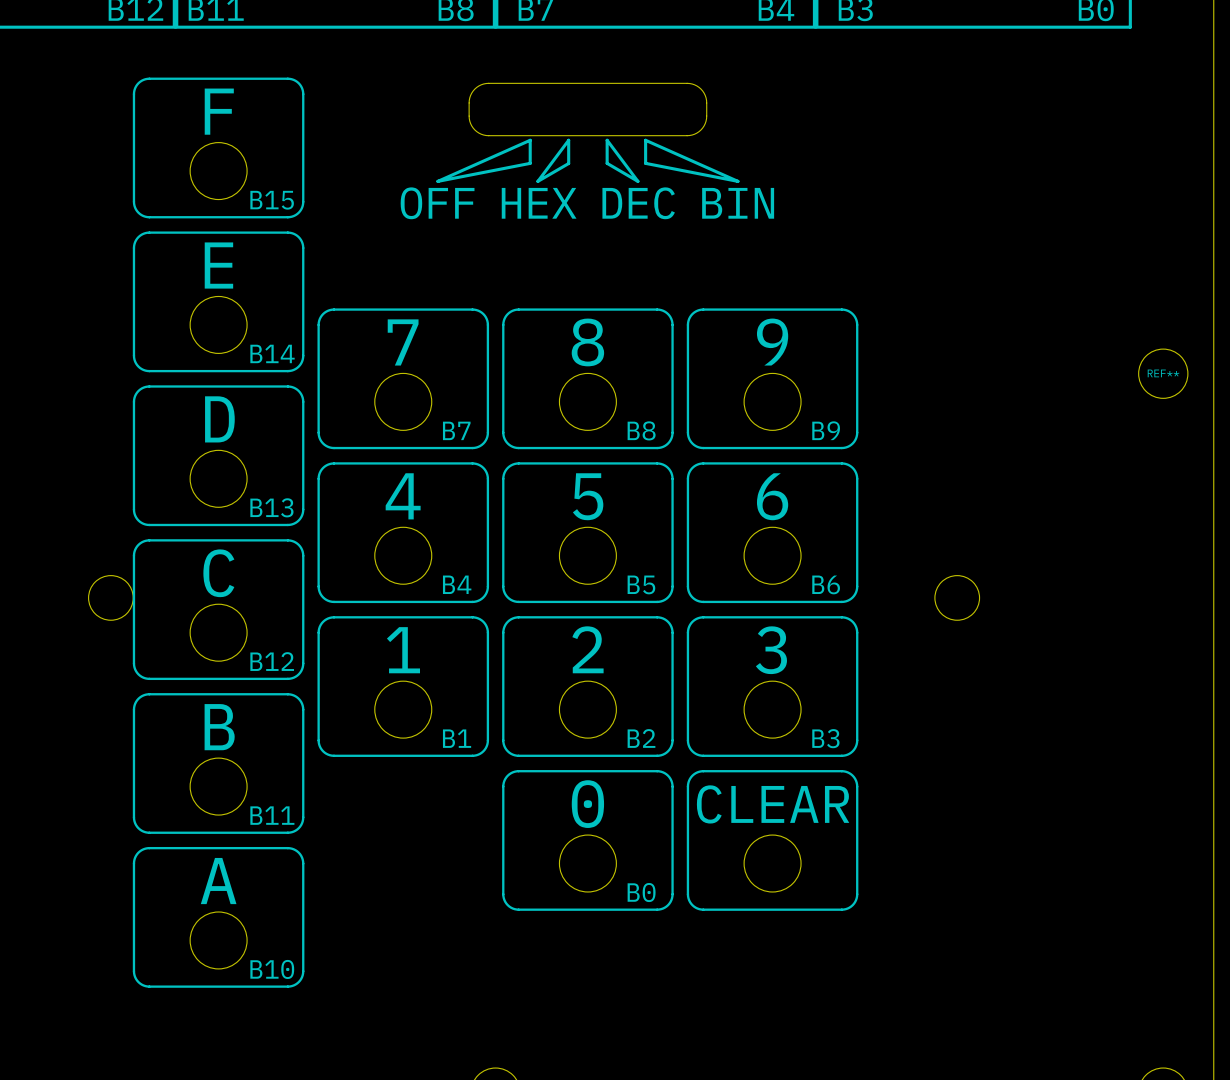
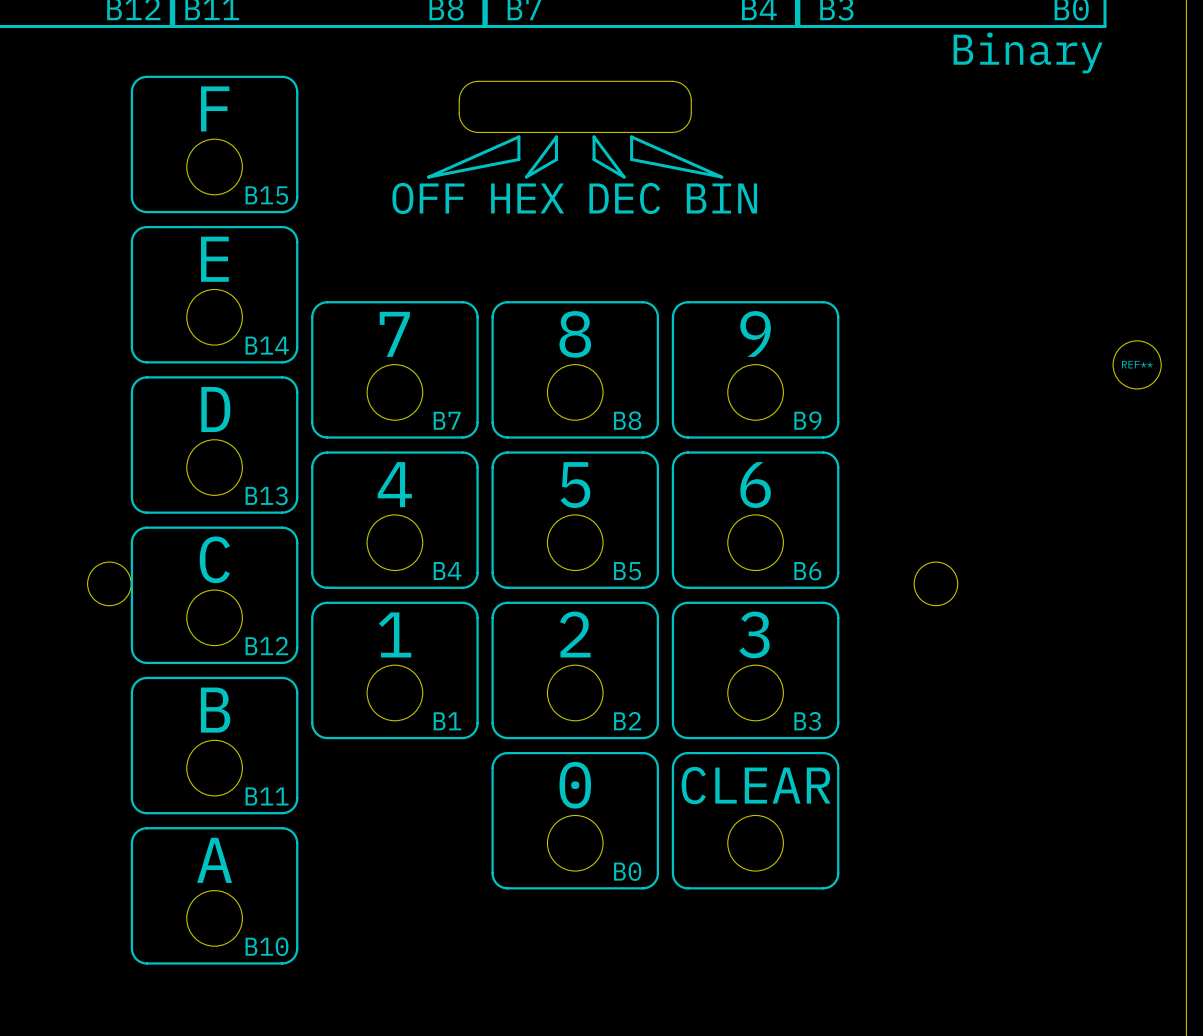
text: none -> Binary (1028, 52)

